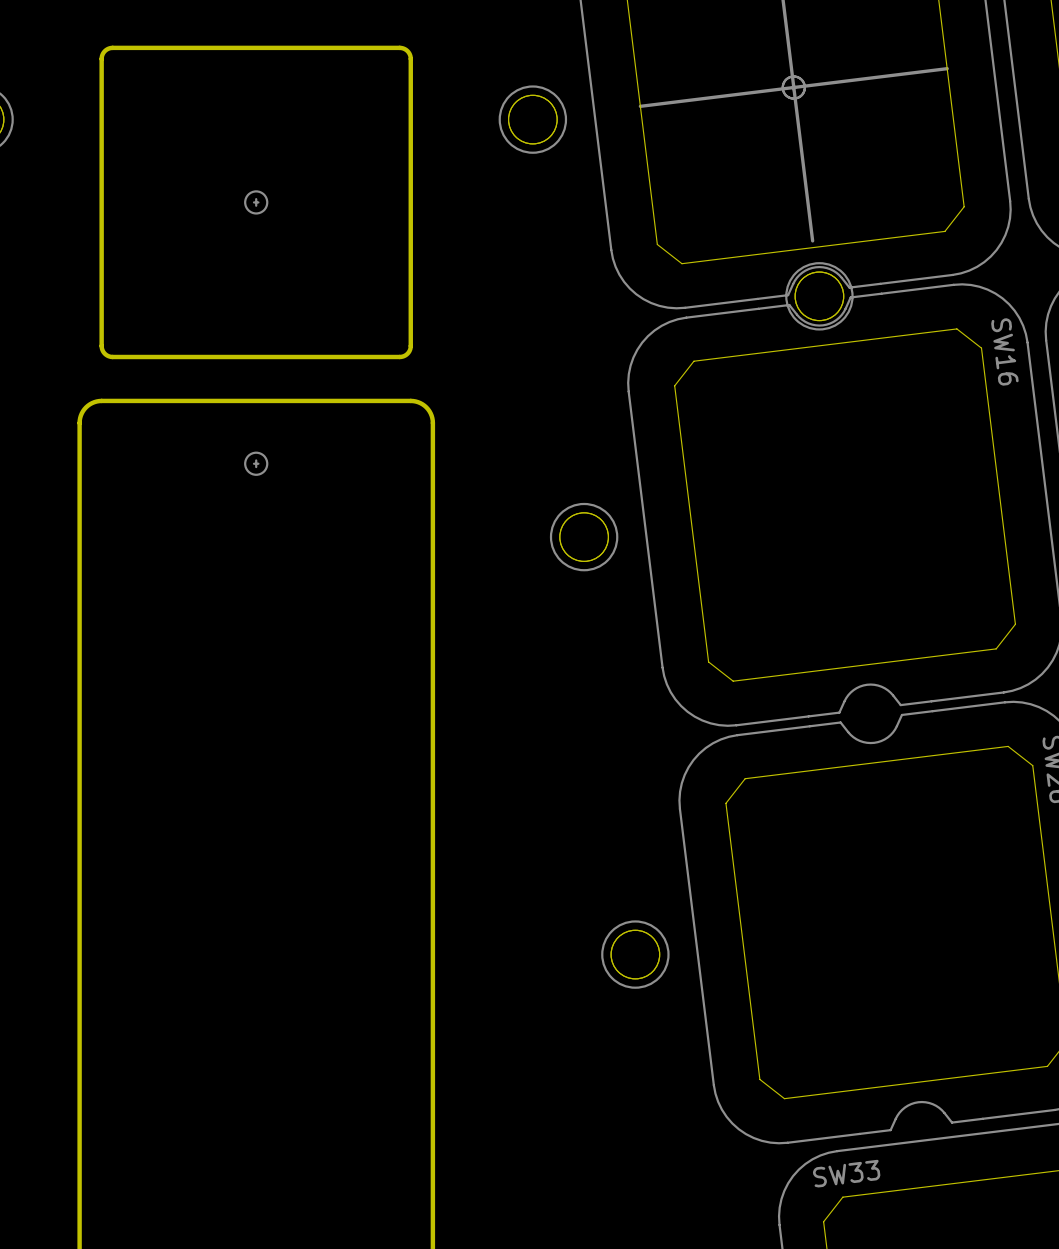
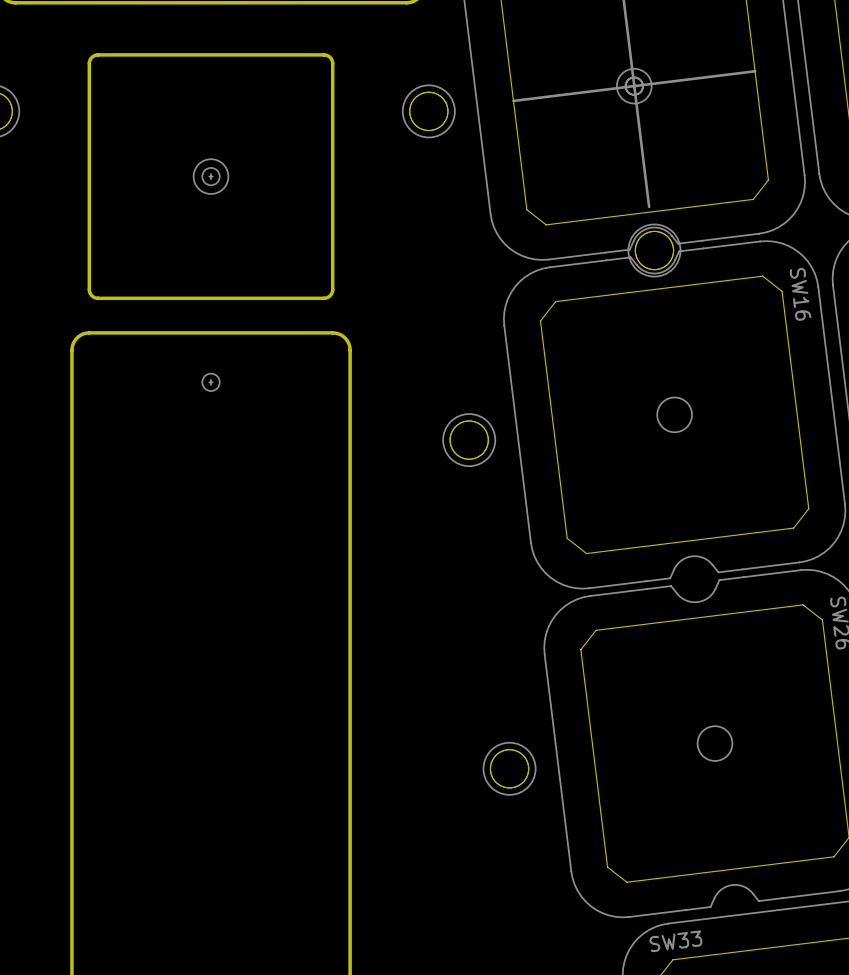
drawing: none -> [616, 67, 653, 105]
drawing: none -> [192, 158, 230, 195]
drawing: none -> [656, 396, 693, 434]
drawing: none -> [696, 725, 734, 762]

